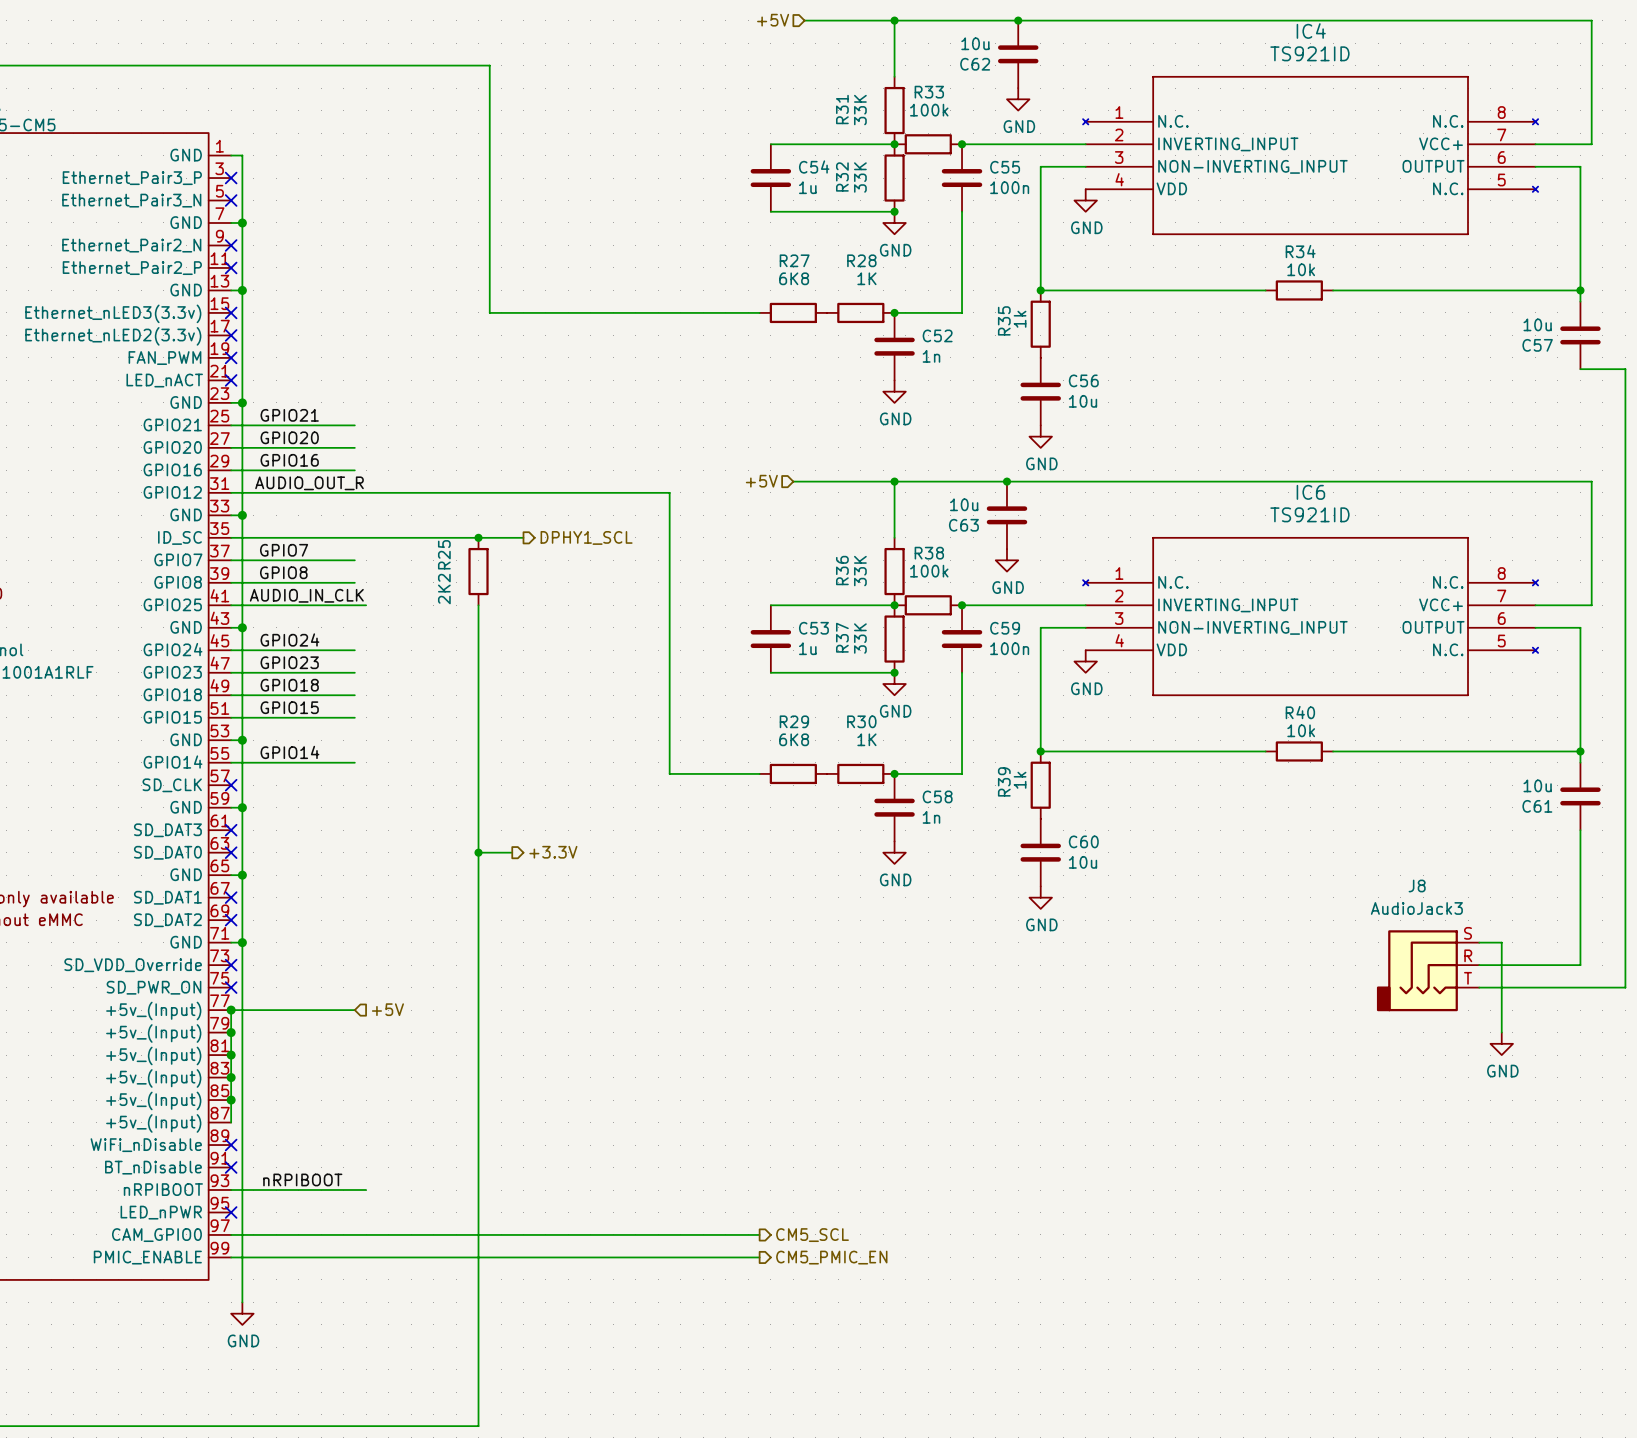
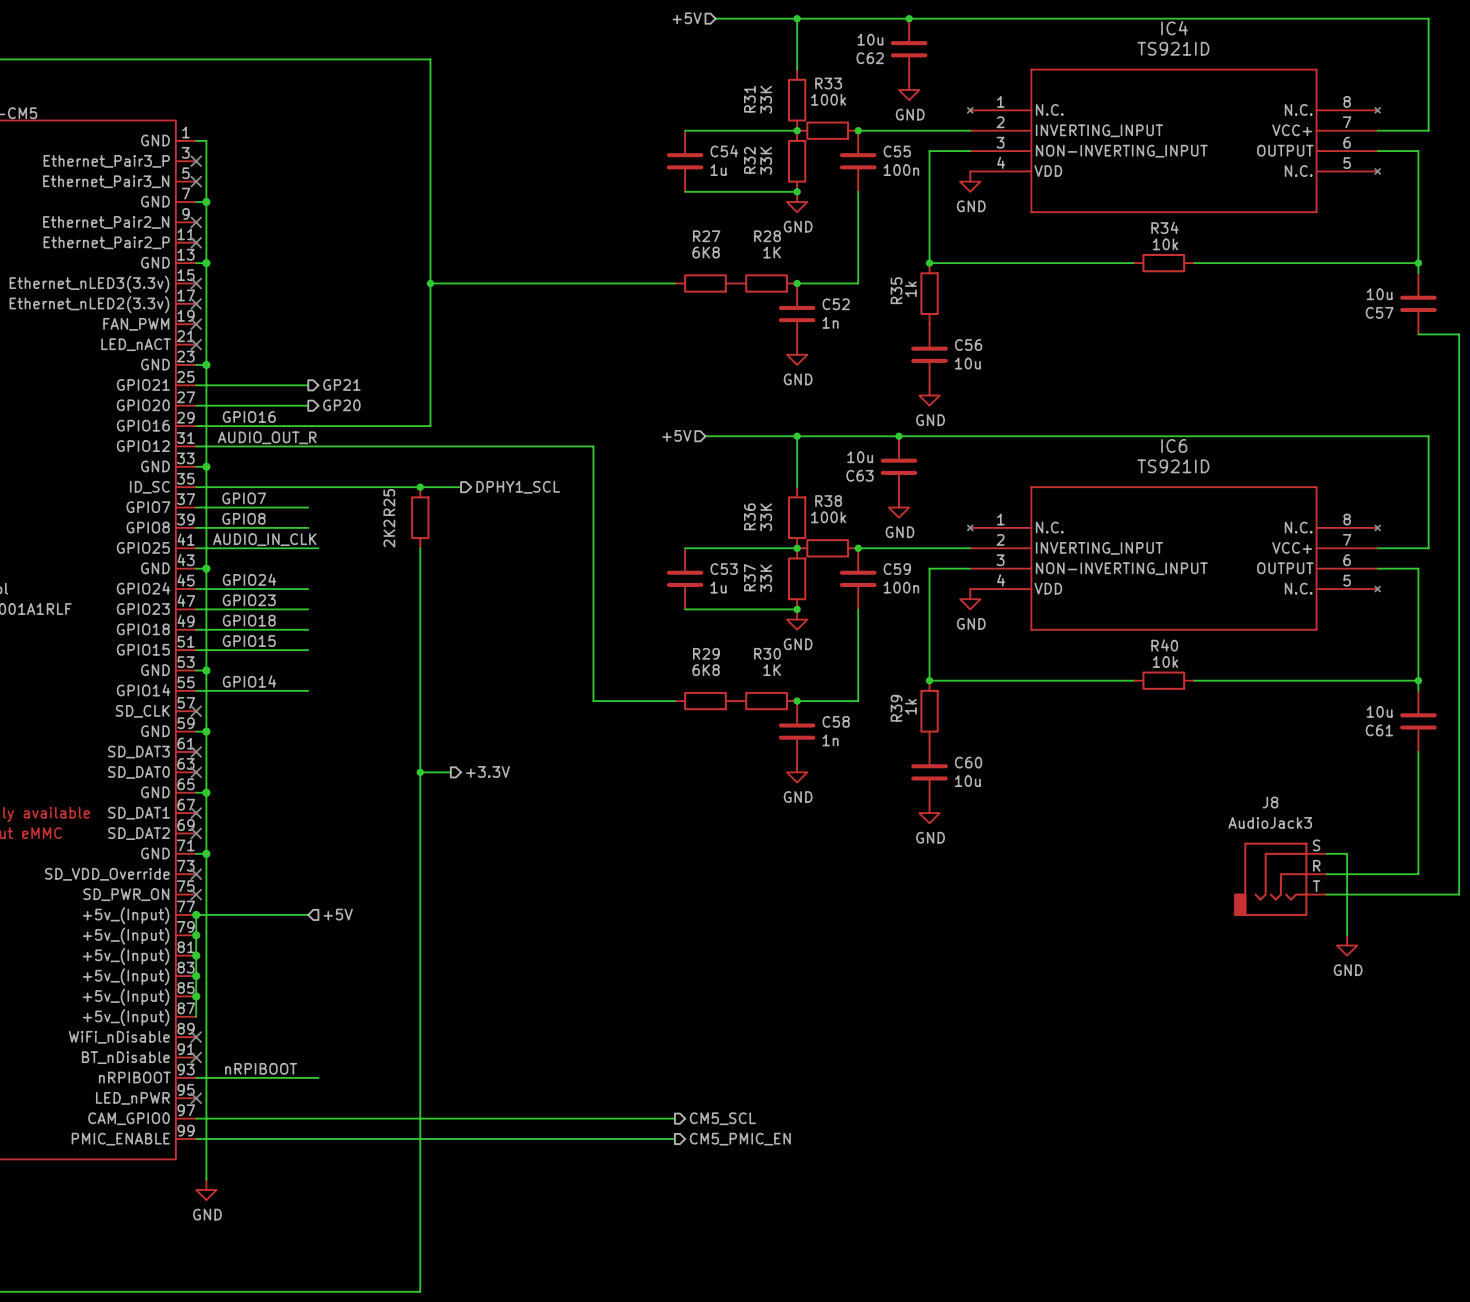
wire: none -> (430, 283) (430, 426) (308, 426)
junction: none -> (430, 283)
label: GPIO21 (289, 415) -> none
hierarchical label: none -> GP21 (341, 384)
label: GPIO20 (289, 437) -> none
hierarchical label: none -> GP20 (341, 405)

